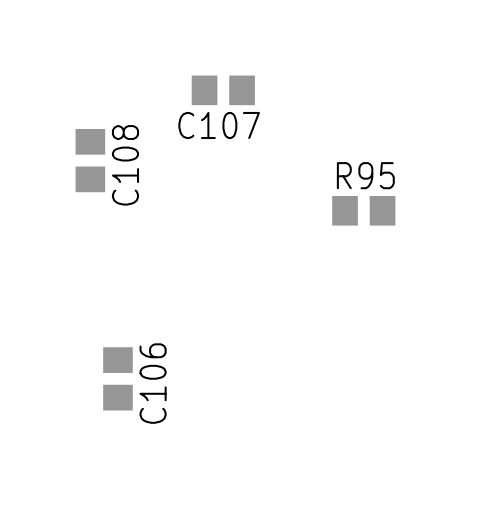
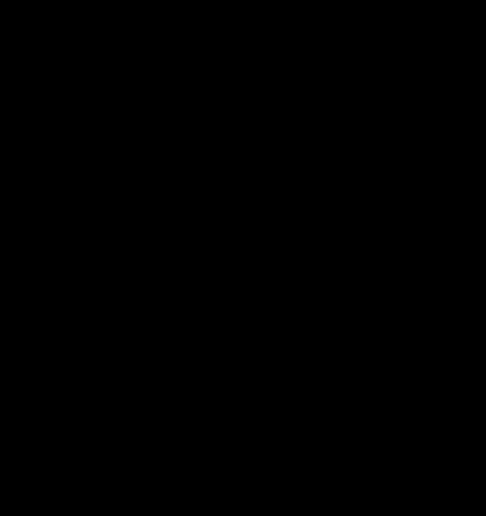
C107: (223, 90) -> none
C108: (90, 160) -> none
R95: (363, 210) -> none
C106: (117, 378) -> none

